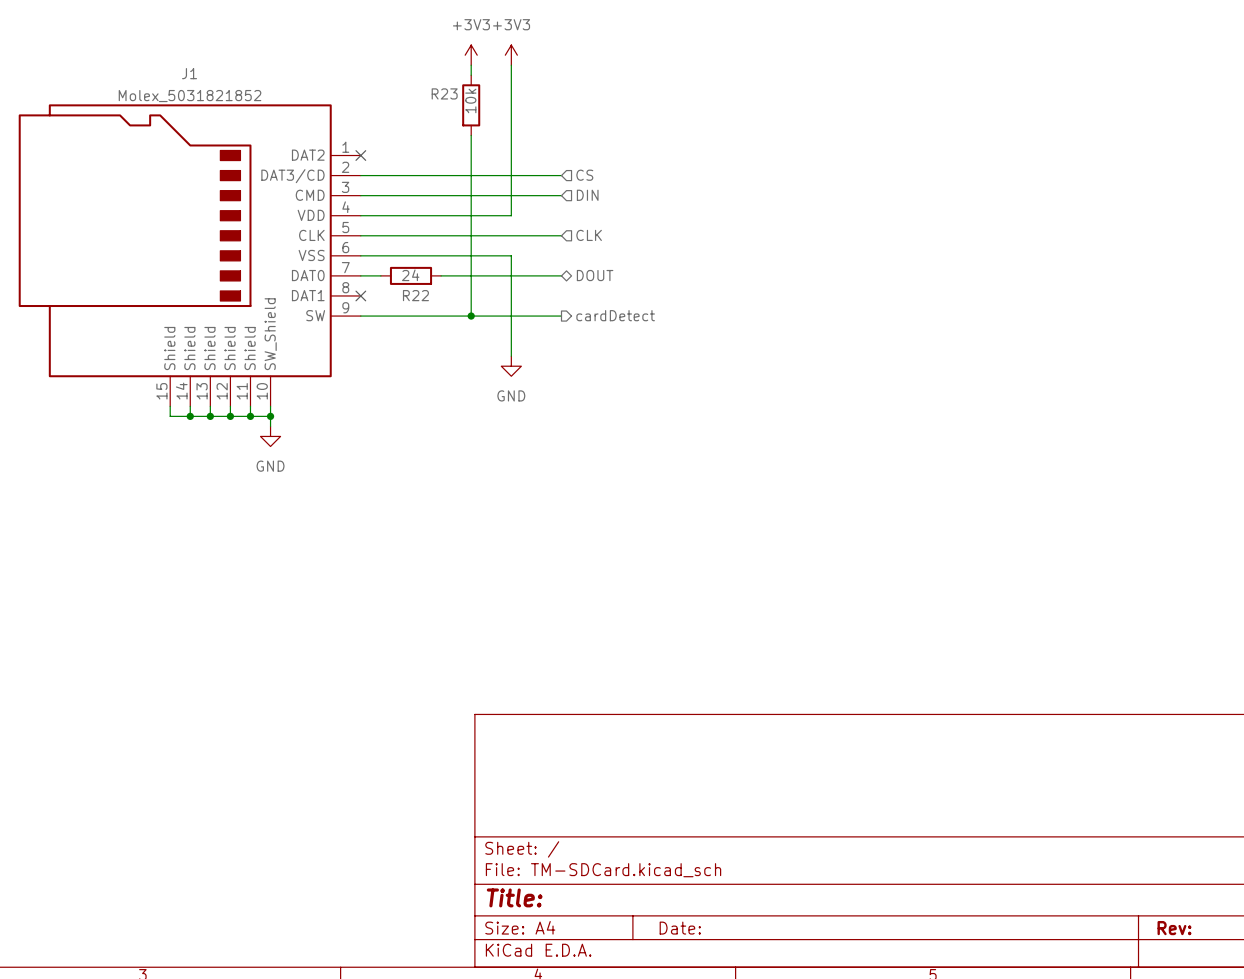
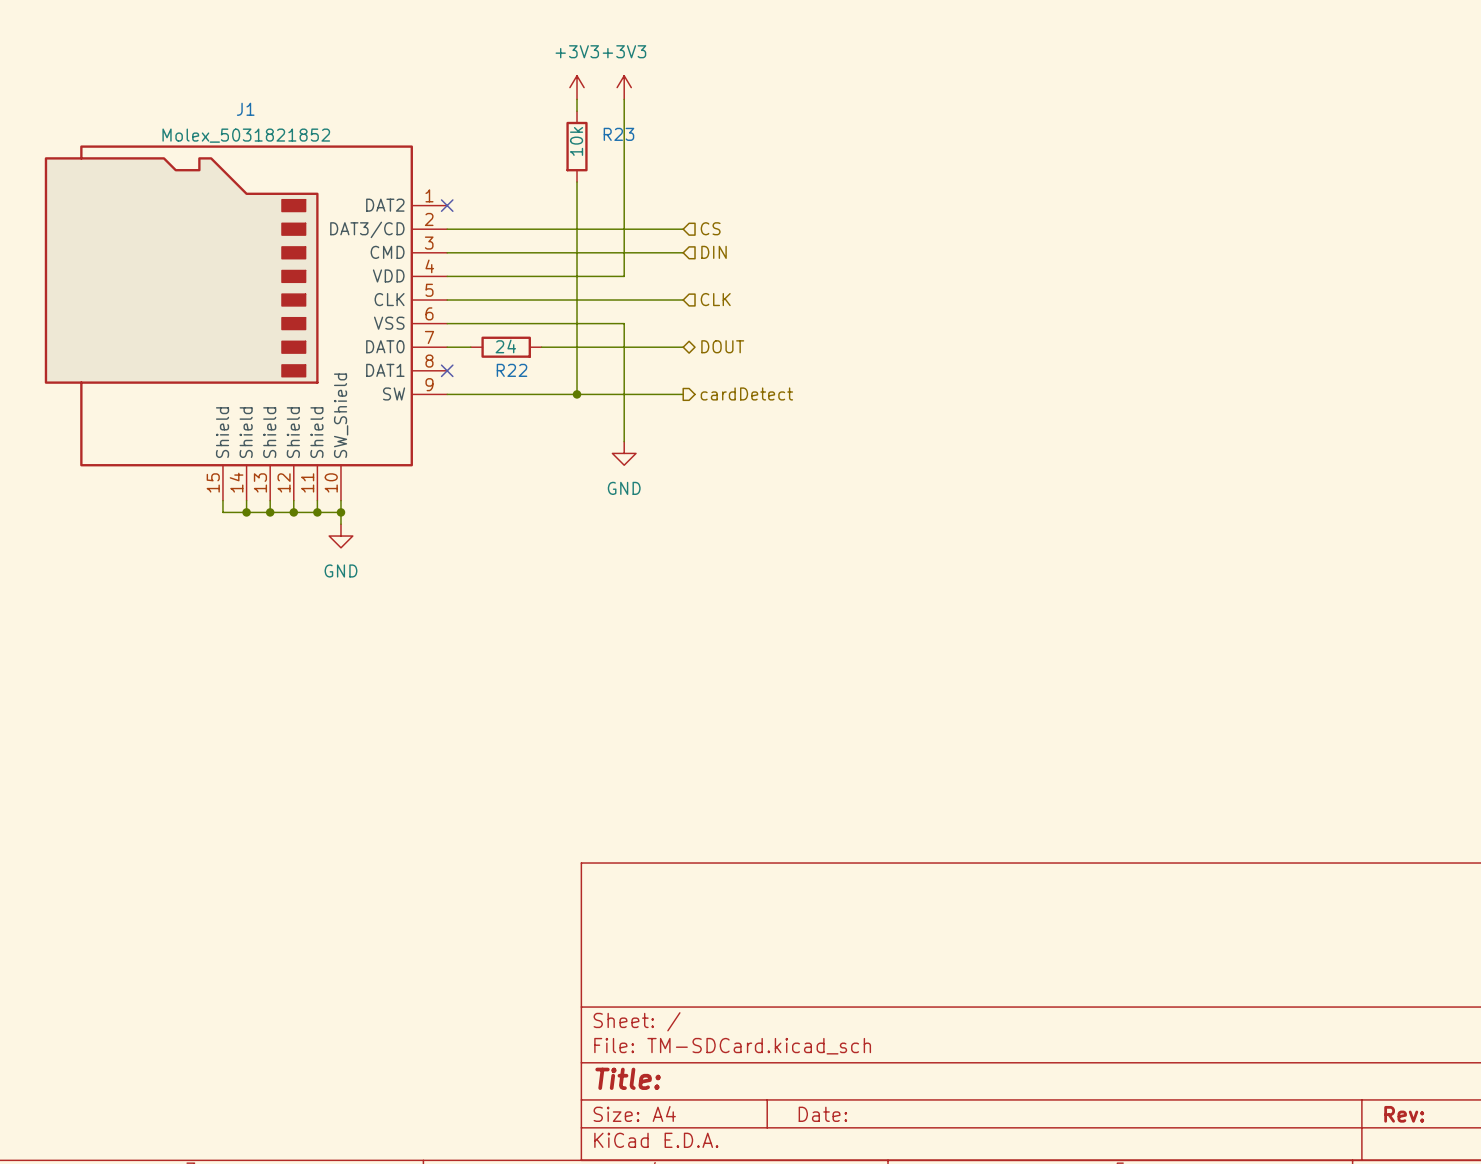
R23 name position: R23 (444, 93) -> R23 (618, 134)

